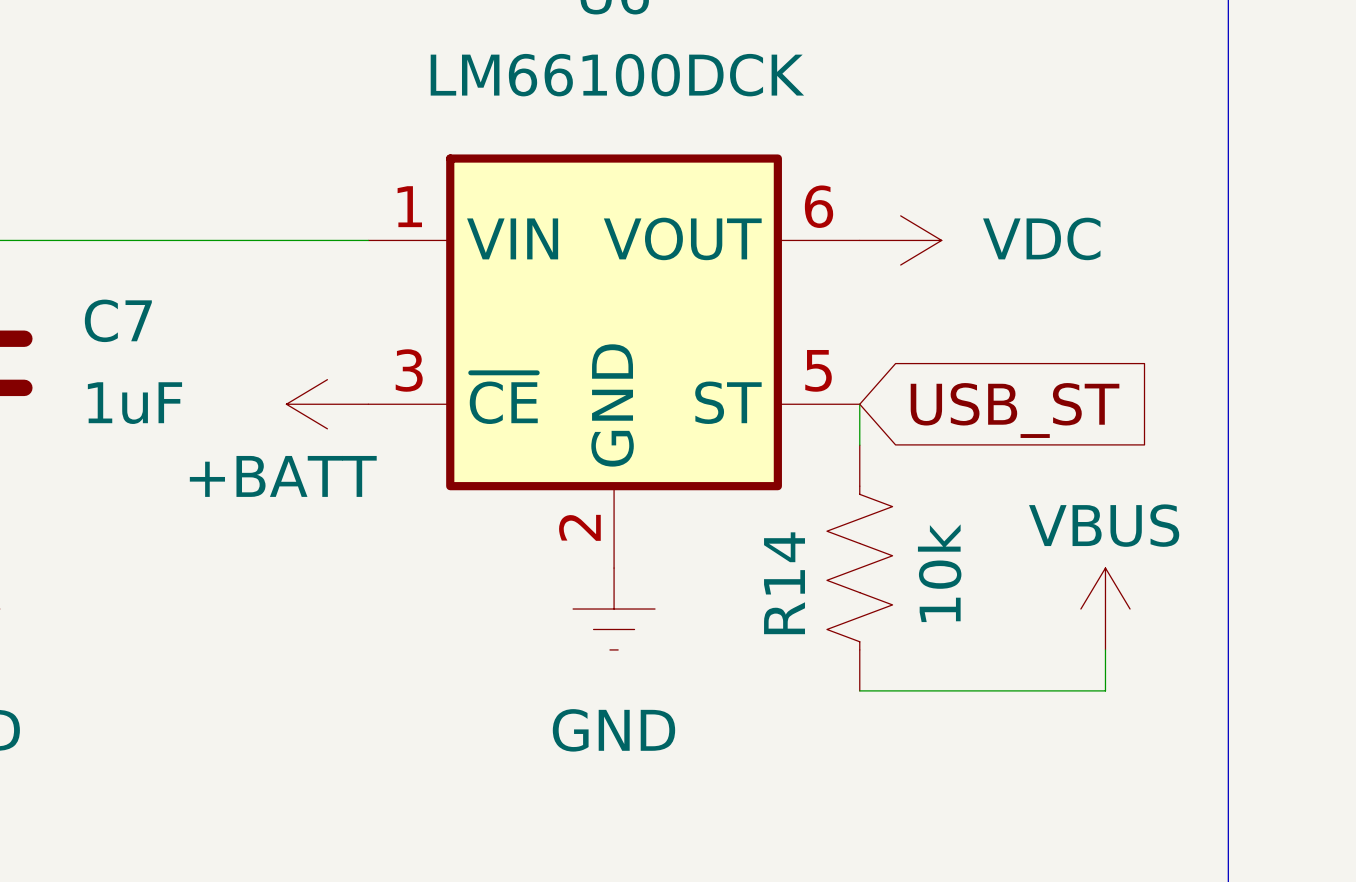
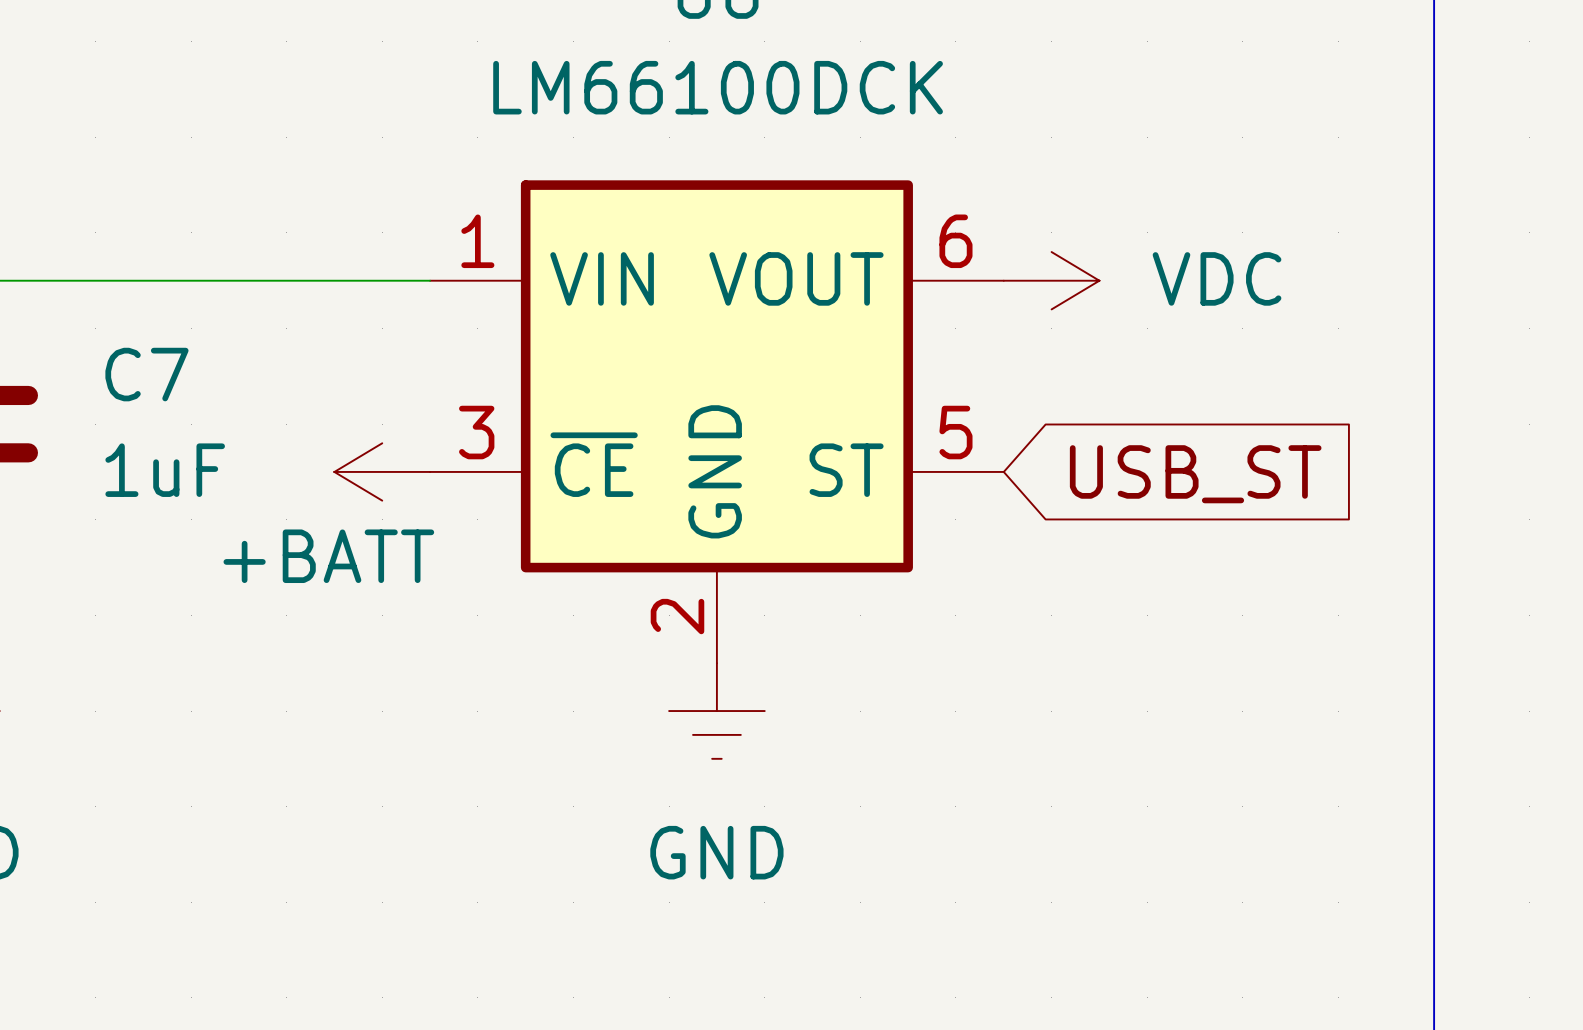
wire: (859, 404) (859, 445) -> none
R14: 10k (859, 568) -> none
power symbol: VBUS (1105, 609) -> none
wire: (1105, 649) (1105, 690) (859, 690) -> none

